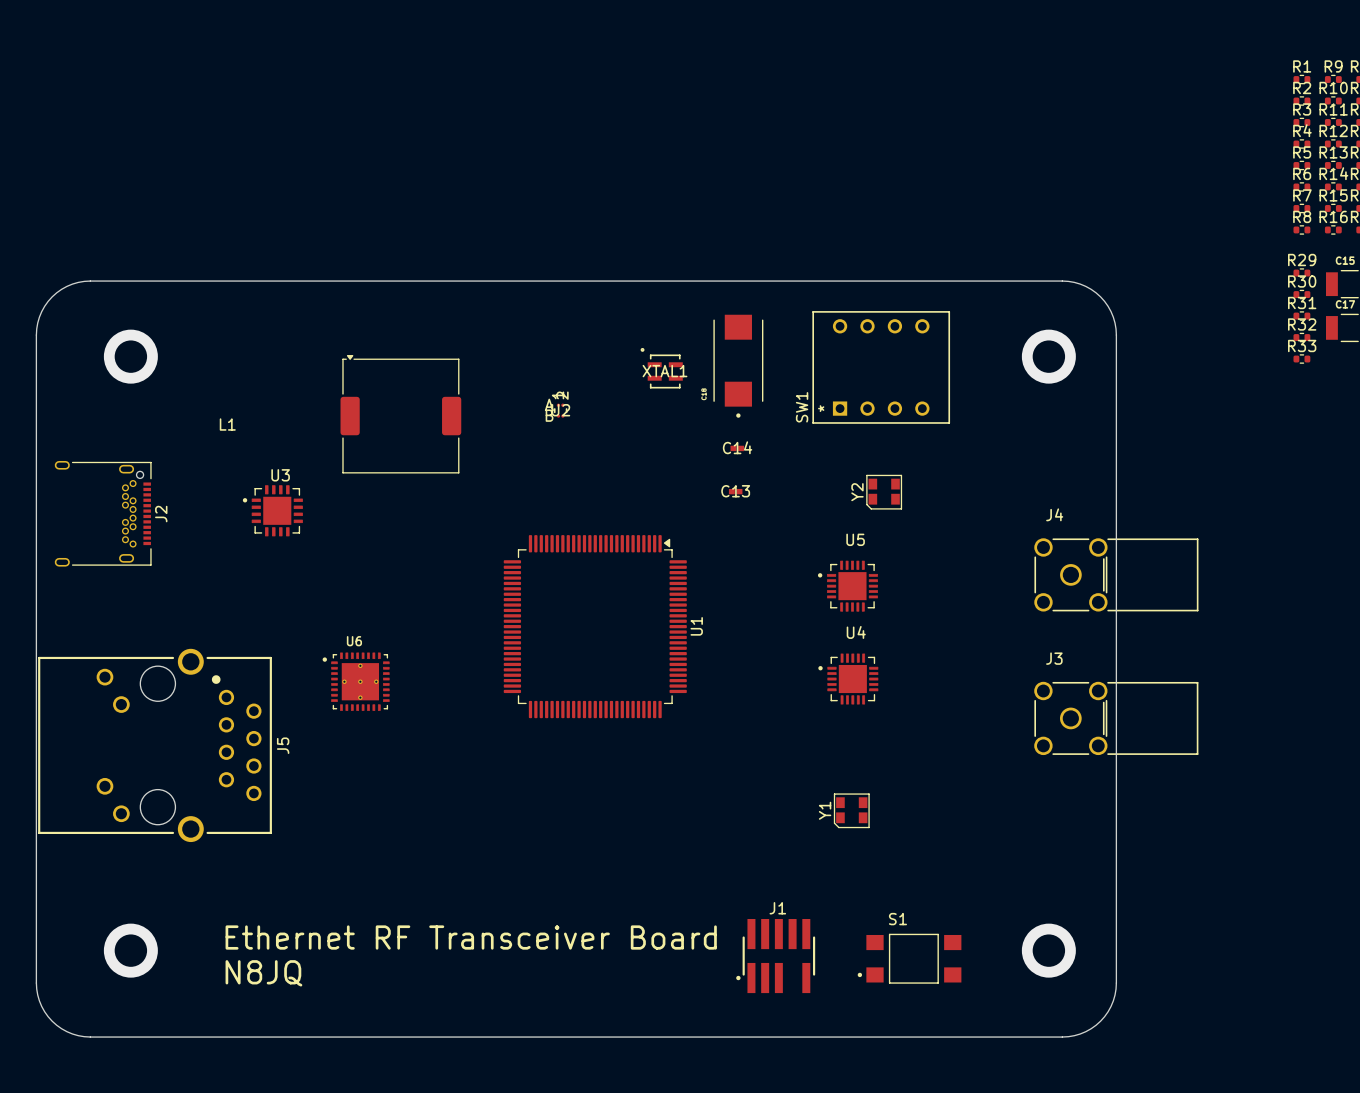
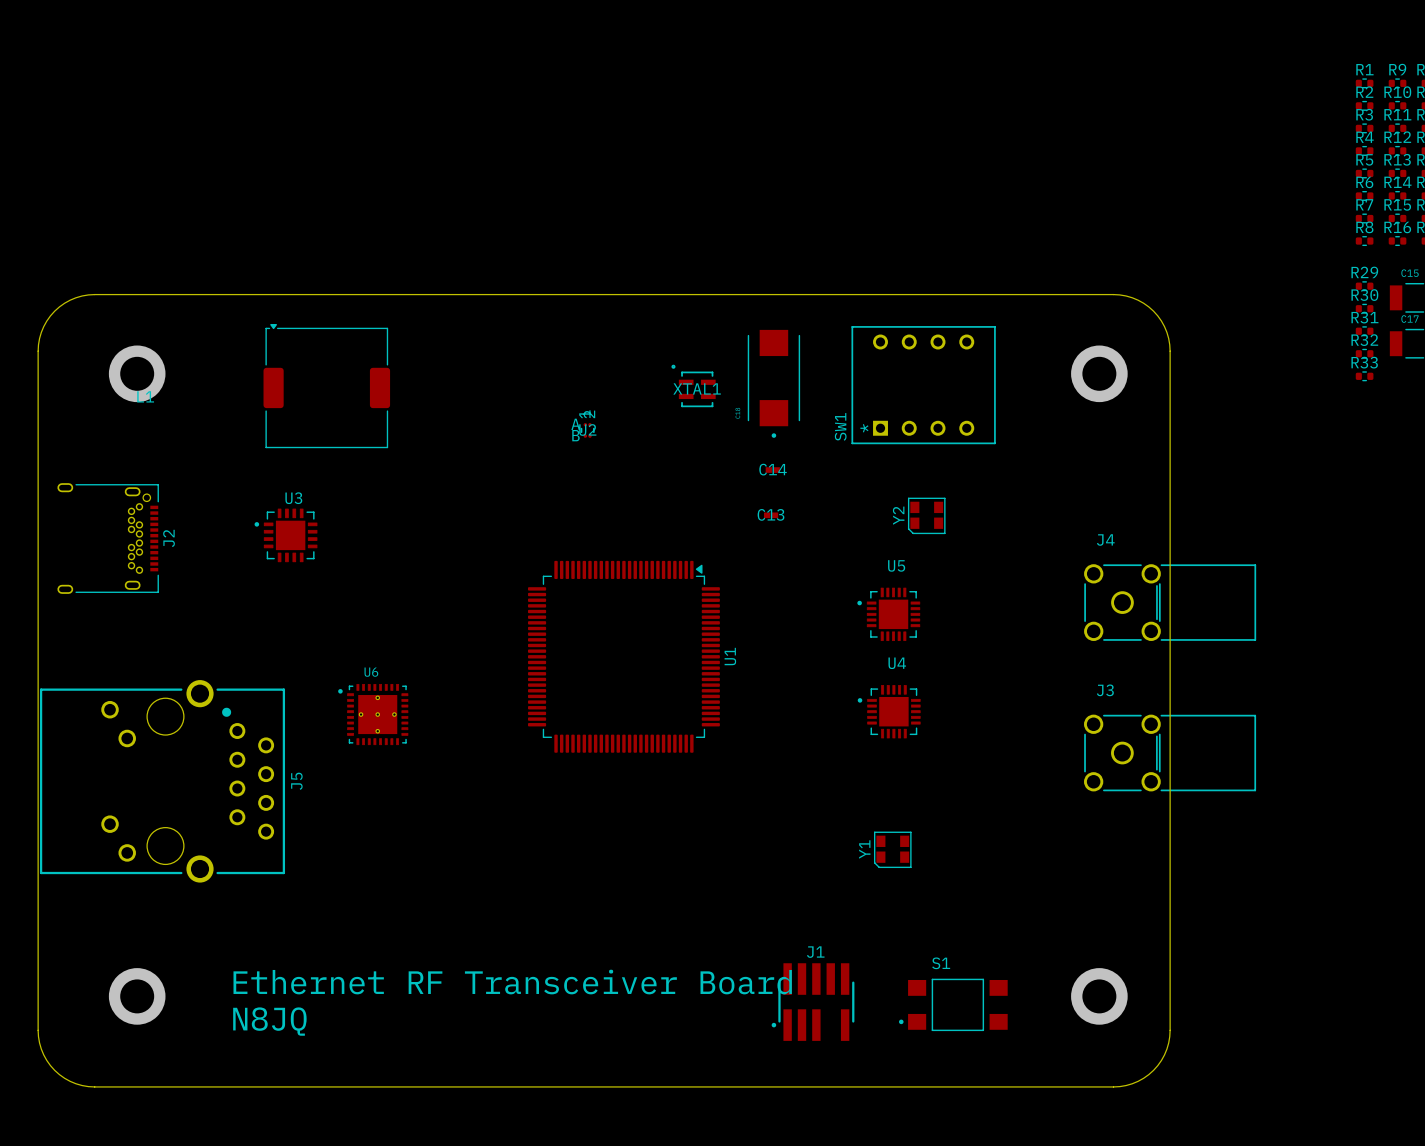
L1 position: (400, 414) -> (326, 386)

